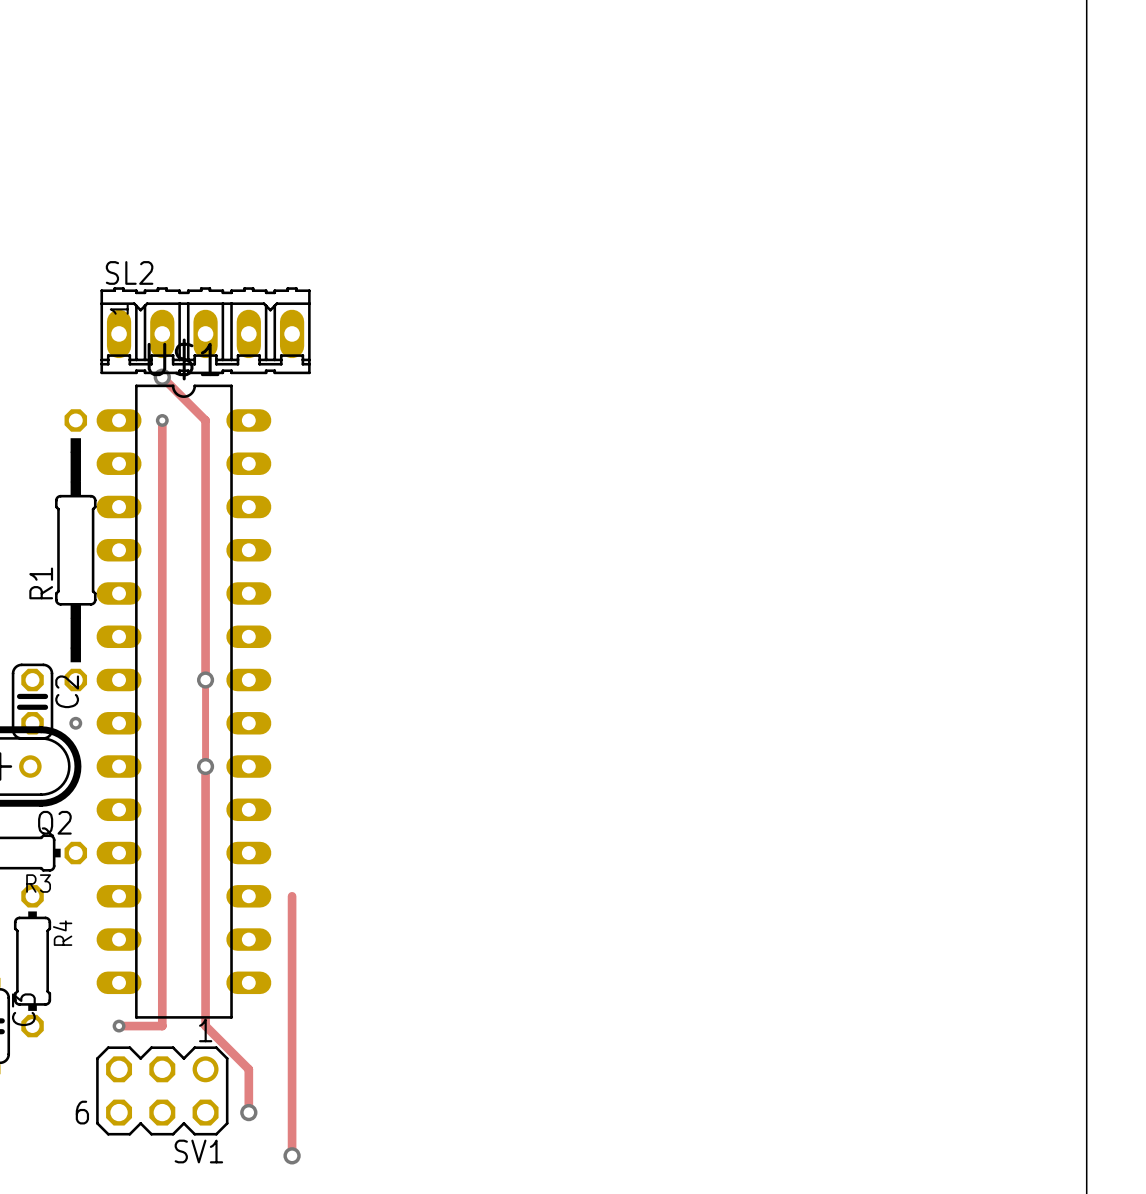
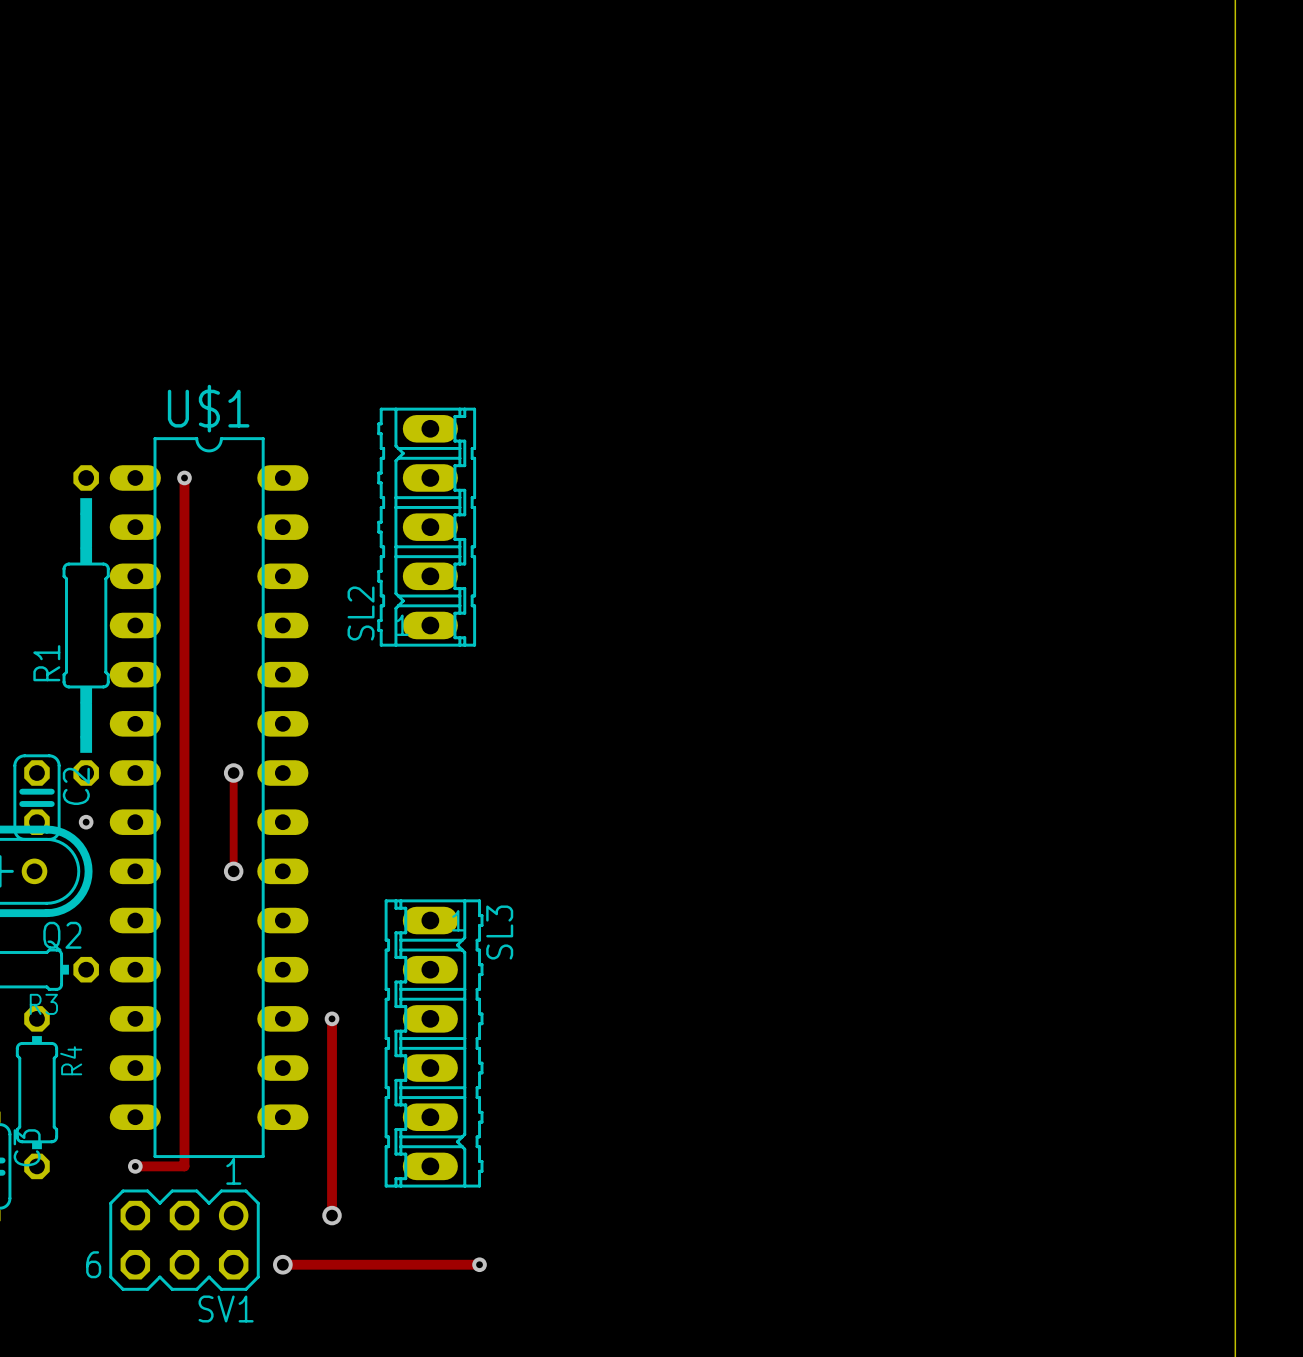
SL2 name position: SL2 (129, 272) -> SL2 (361, 613)
SL2 footprint: [100, 287, 311, 375] -> [377, 407, 477, 647]
track: (162, 377) (205, 420) (205, 680) -> none
via: (162, 377) -> none
track: (205, 766) (205, 1026) (248, 1069) (248, 1112) -> (479, 1264) (282, 1264)
via: none -> (332, 1018)
SL3: none -> (434, 1043)
track: (292, 1069) (292, 1155) -> none
via: none -> (332, 1215)
via: none -> (479, 1264)
via: (292, 1155) -> none

